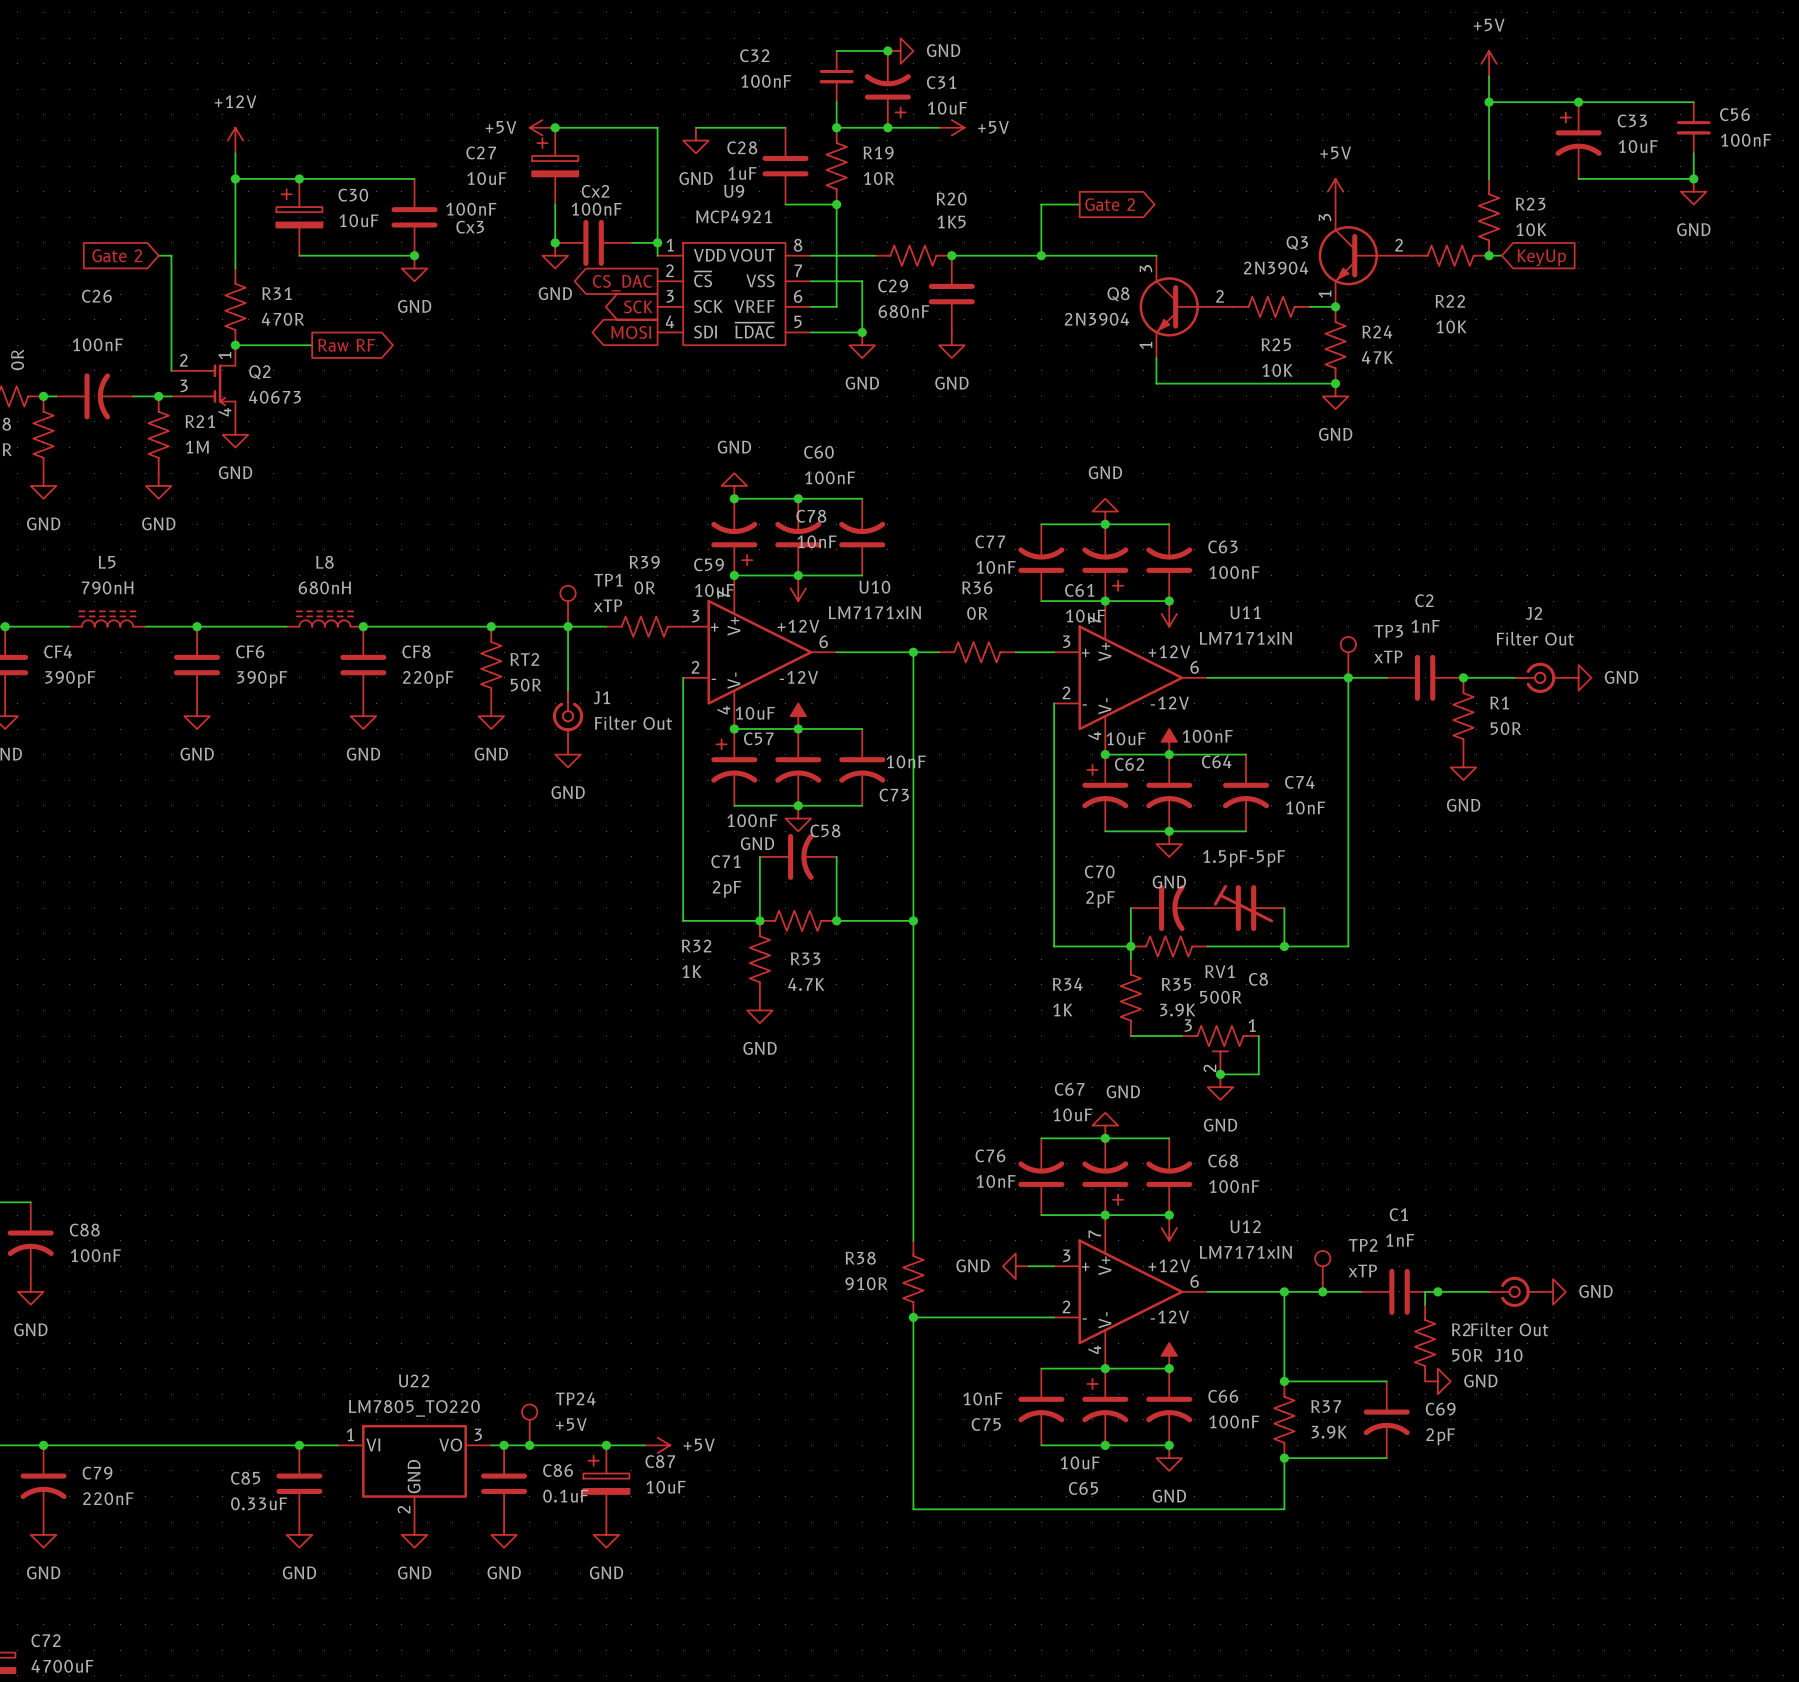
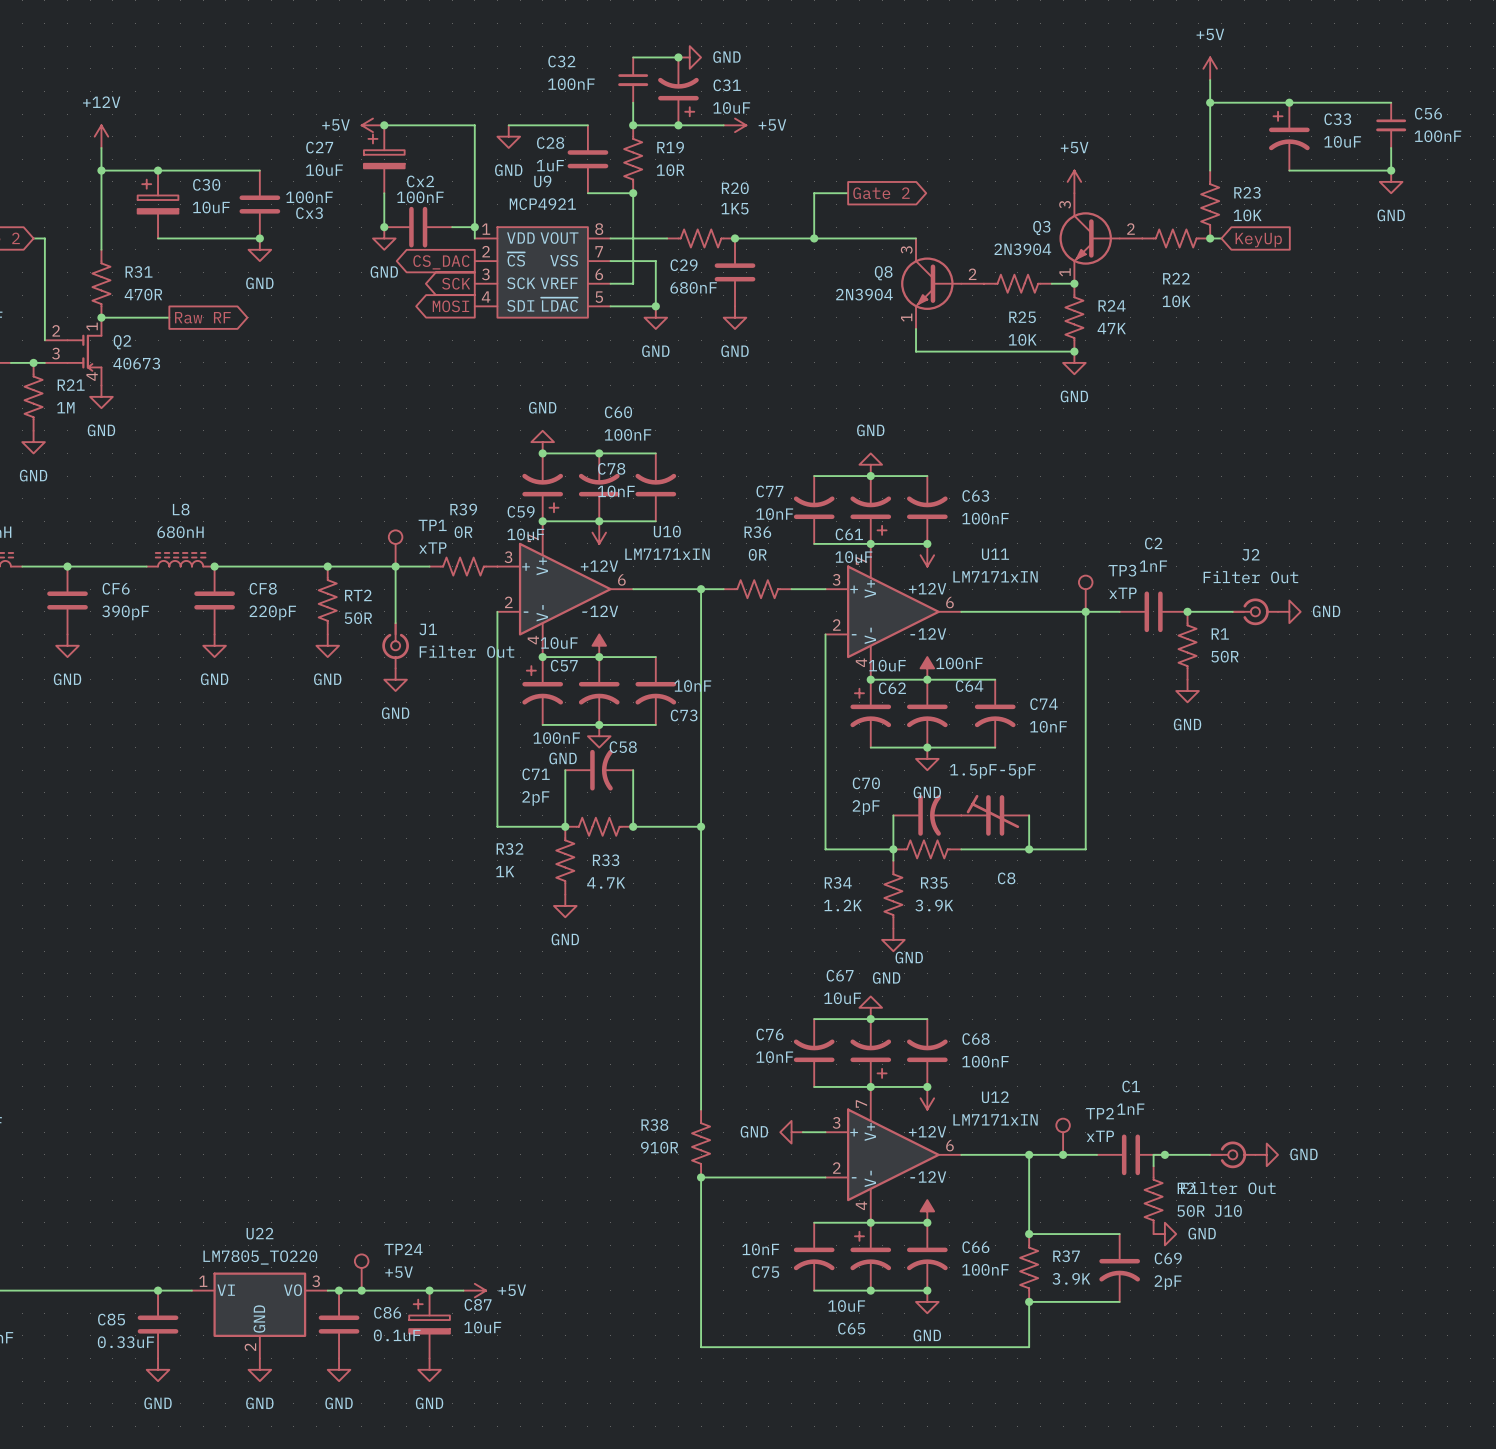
R34 value: 1K (1062, 1009) -> 1.2K (842, 905)
wire: (1130, 1036) (1182, 1036) -> none
wire: (1258, 1036) (1258, 1074) (1220, 1074) -> none
RV1: 500R (1220, 1050) -> none
junction: (1220, 1074) -> none
power symbol position: GND (1220, 1087) -> GND (893, 939)
power symbol text position: GND (1220, 1125) -> GND (909, 957)

